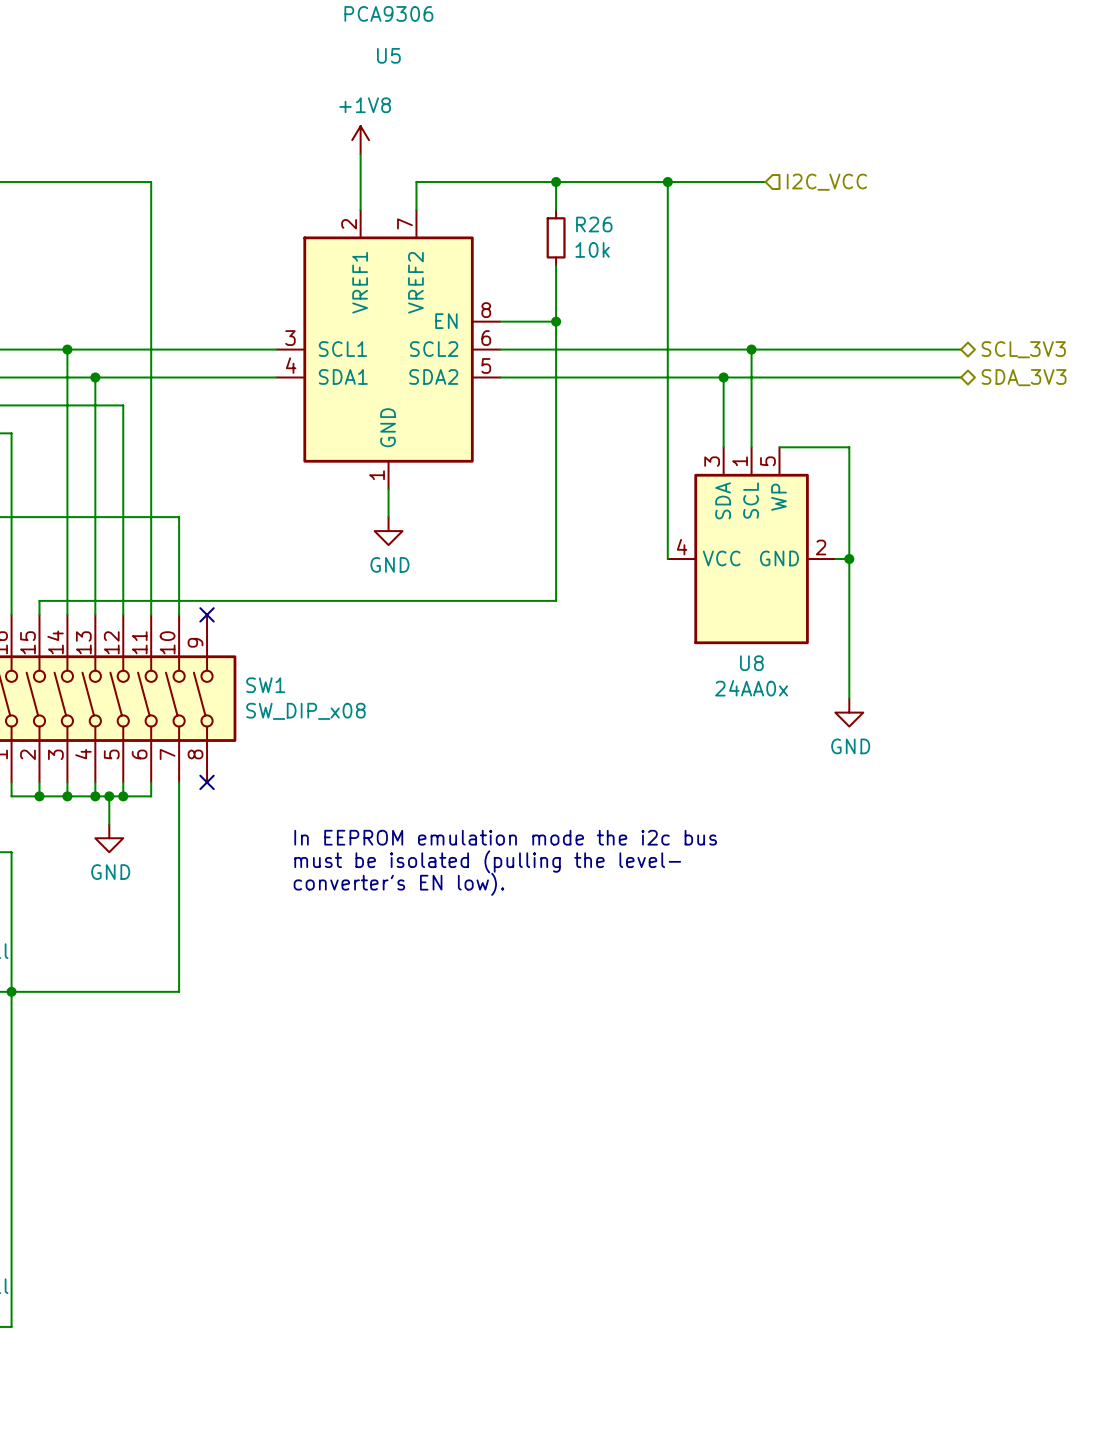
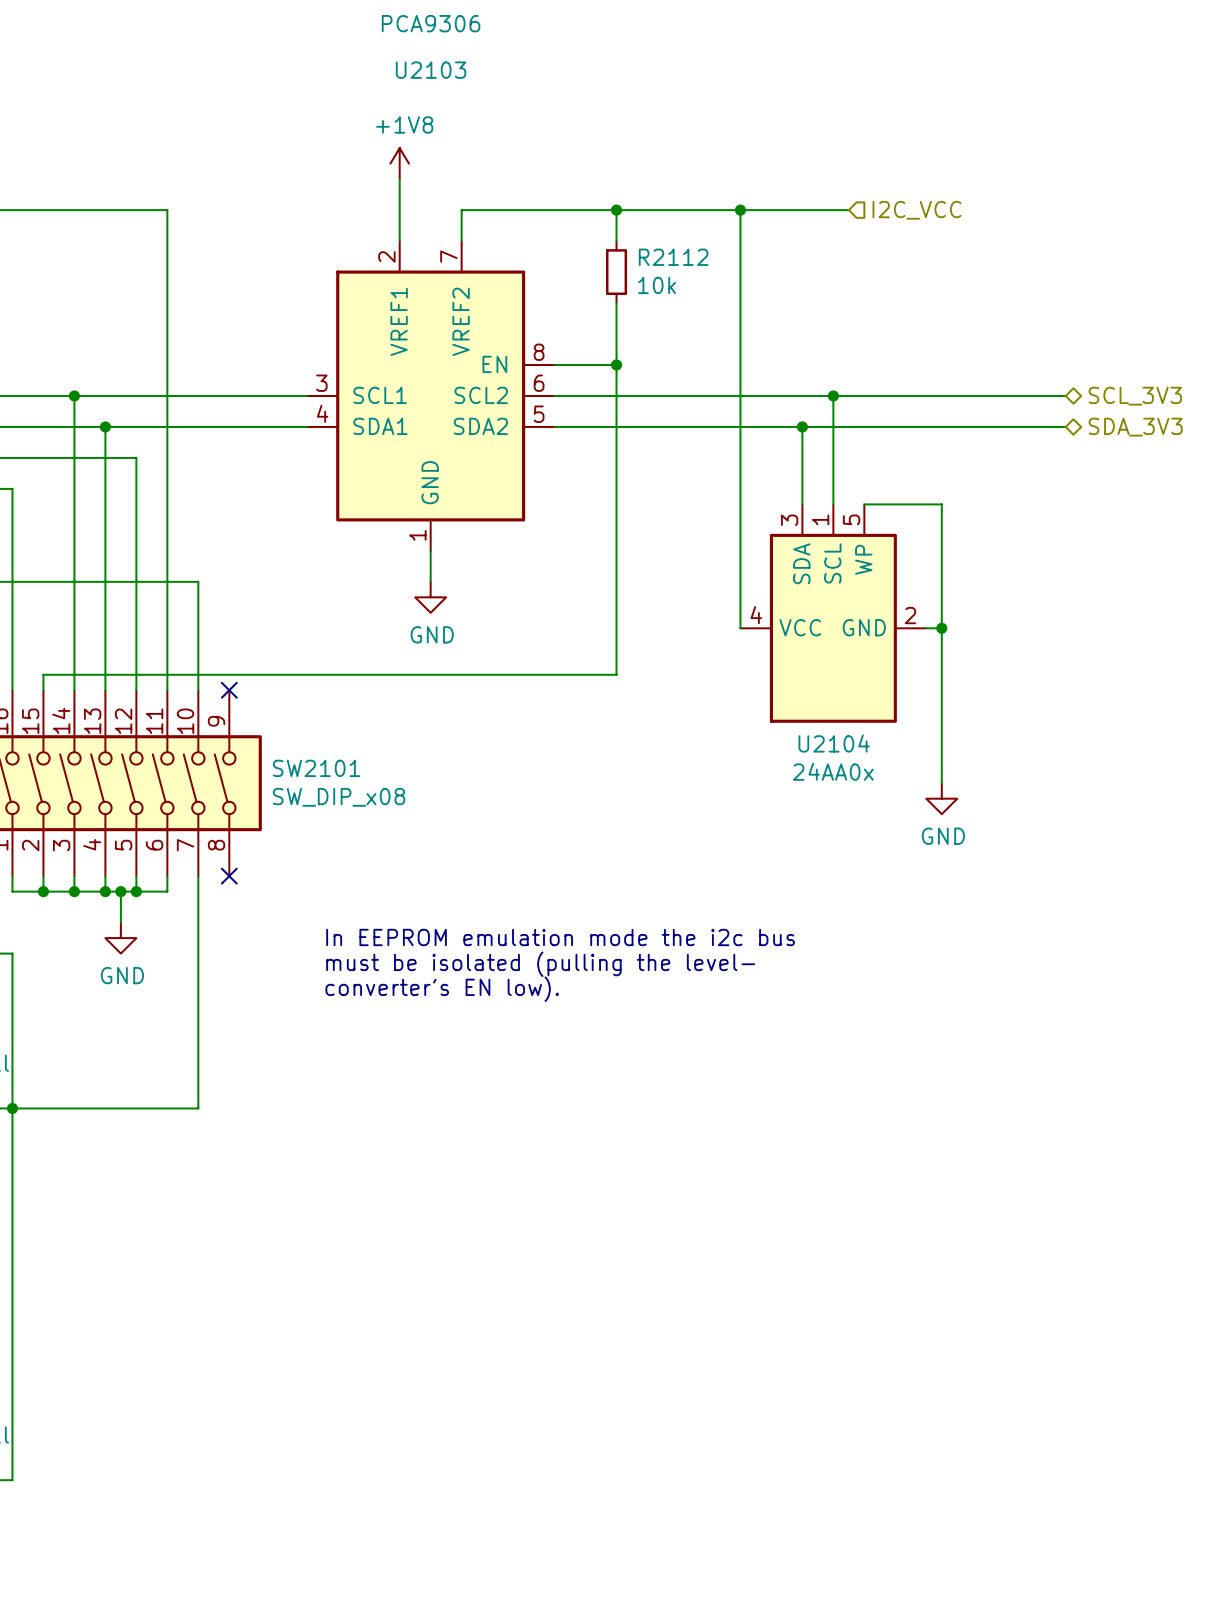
U5 name: U5 (388, 55) -> U2103 (431, 70)
R26 name: R26 (594, 224) -> R2112 (673, 257)
U8 name: U8 (751, 663) -> U2104 (834, 743)
SW1 name: SW1 (265, 685) -> SW2101 (316, 768)

